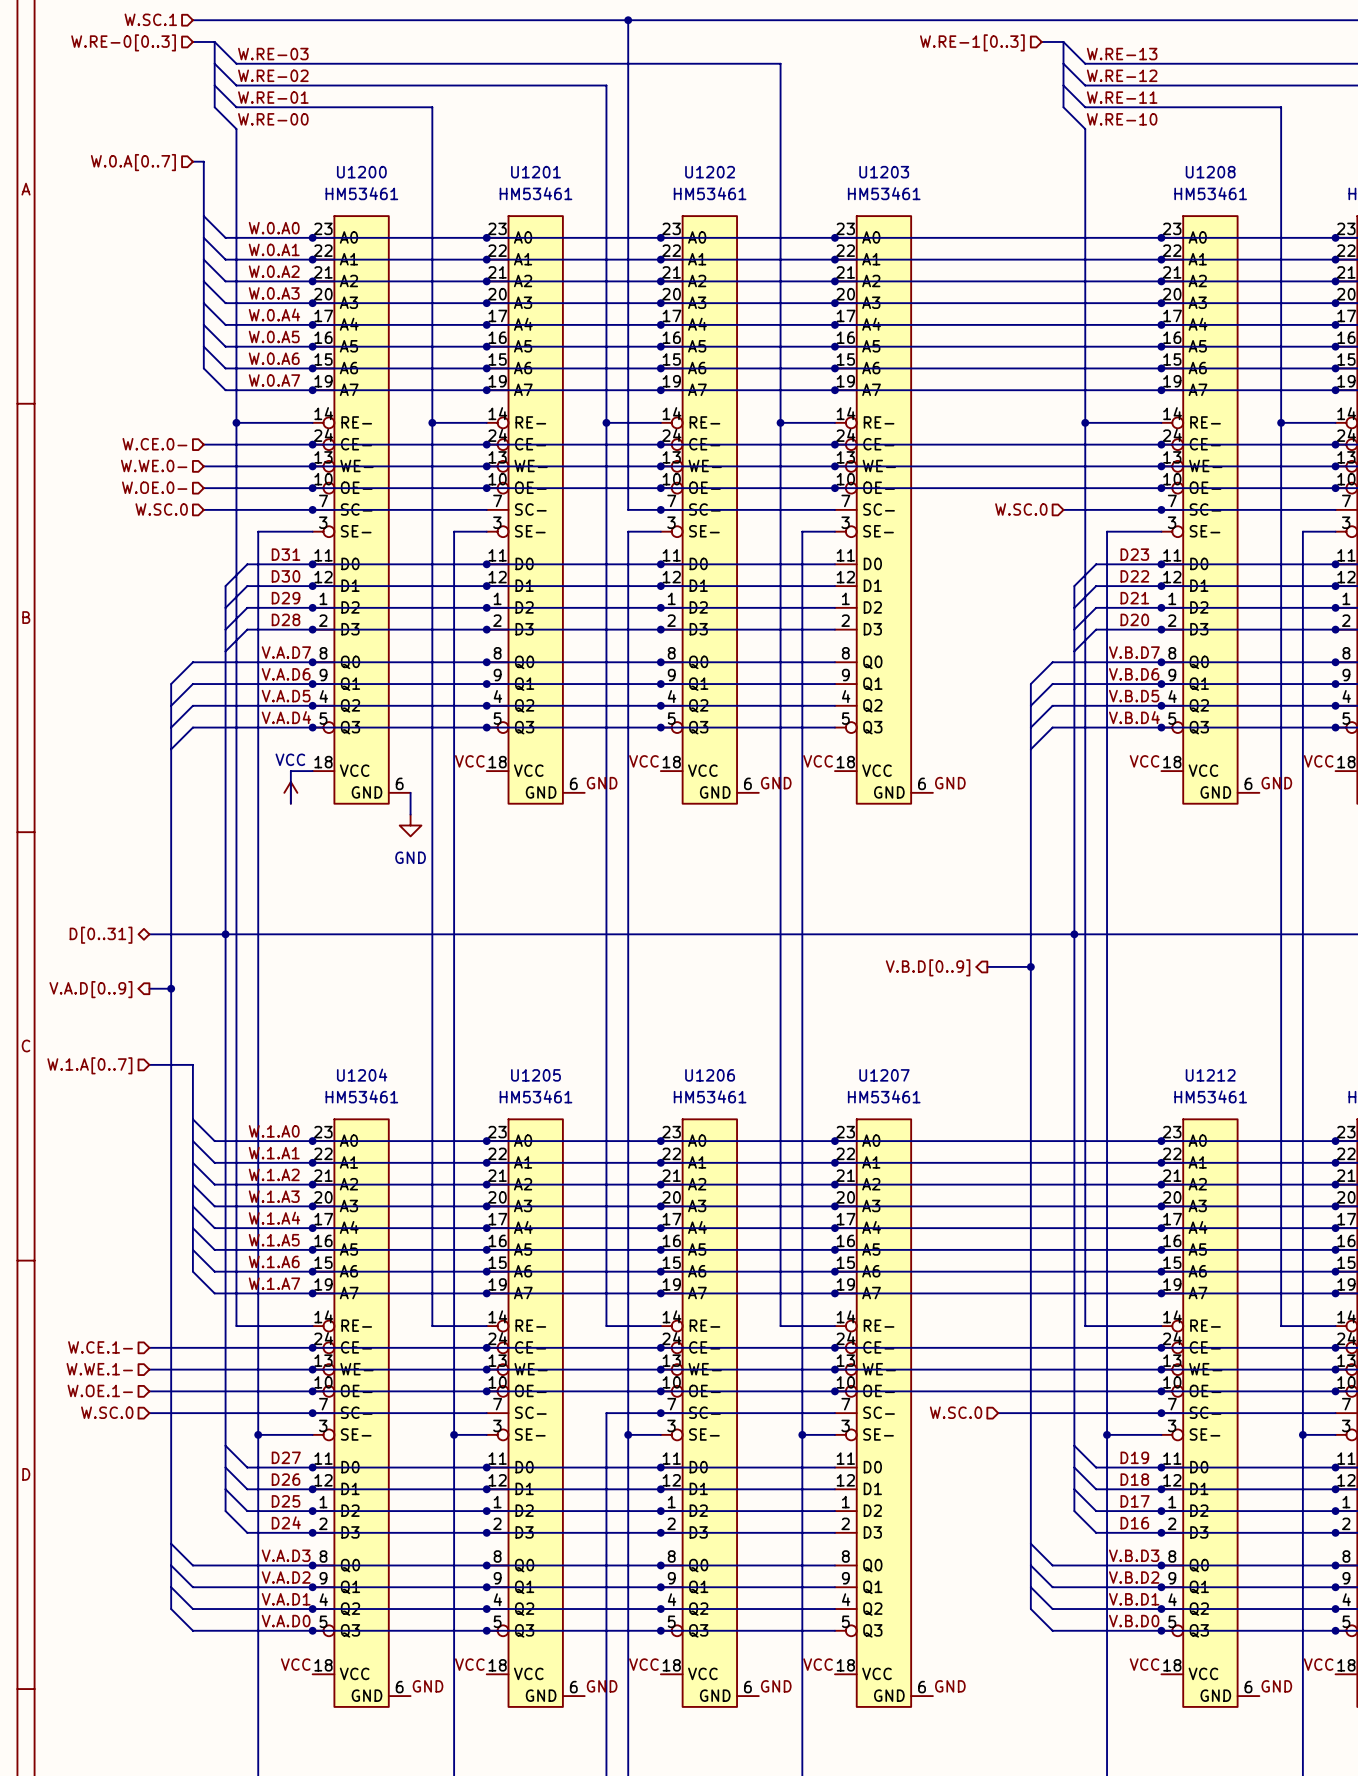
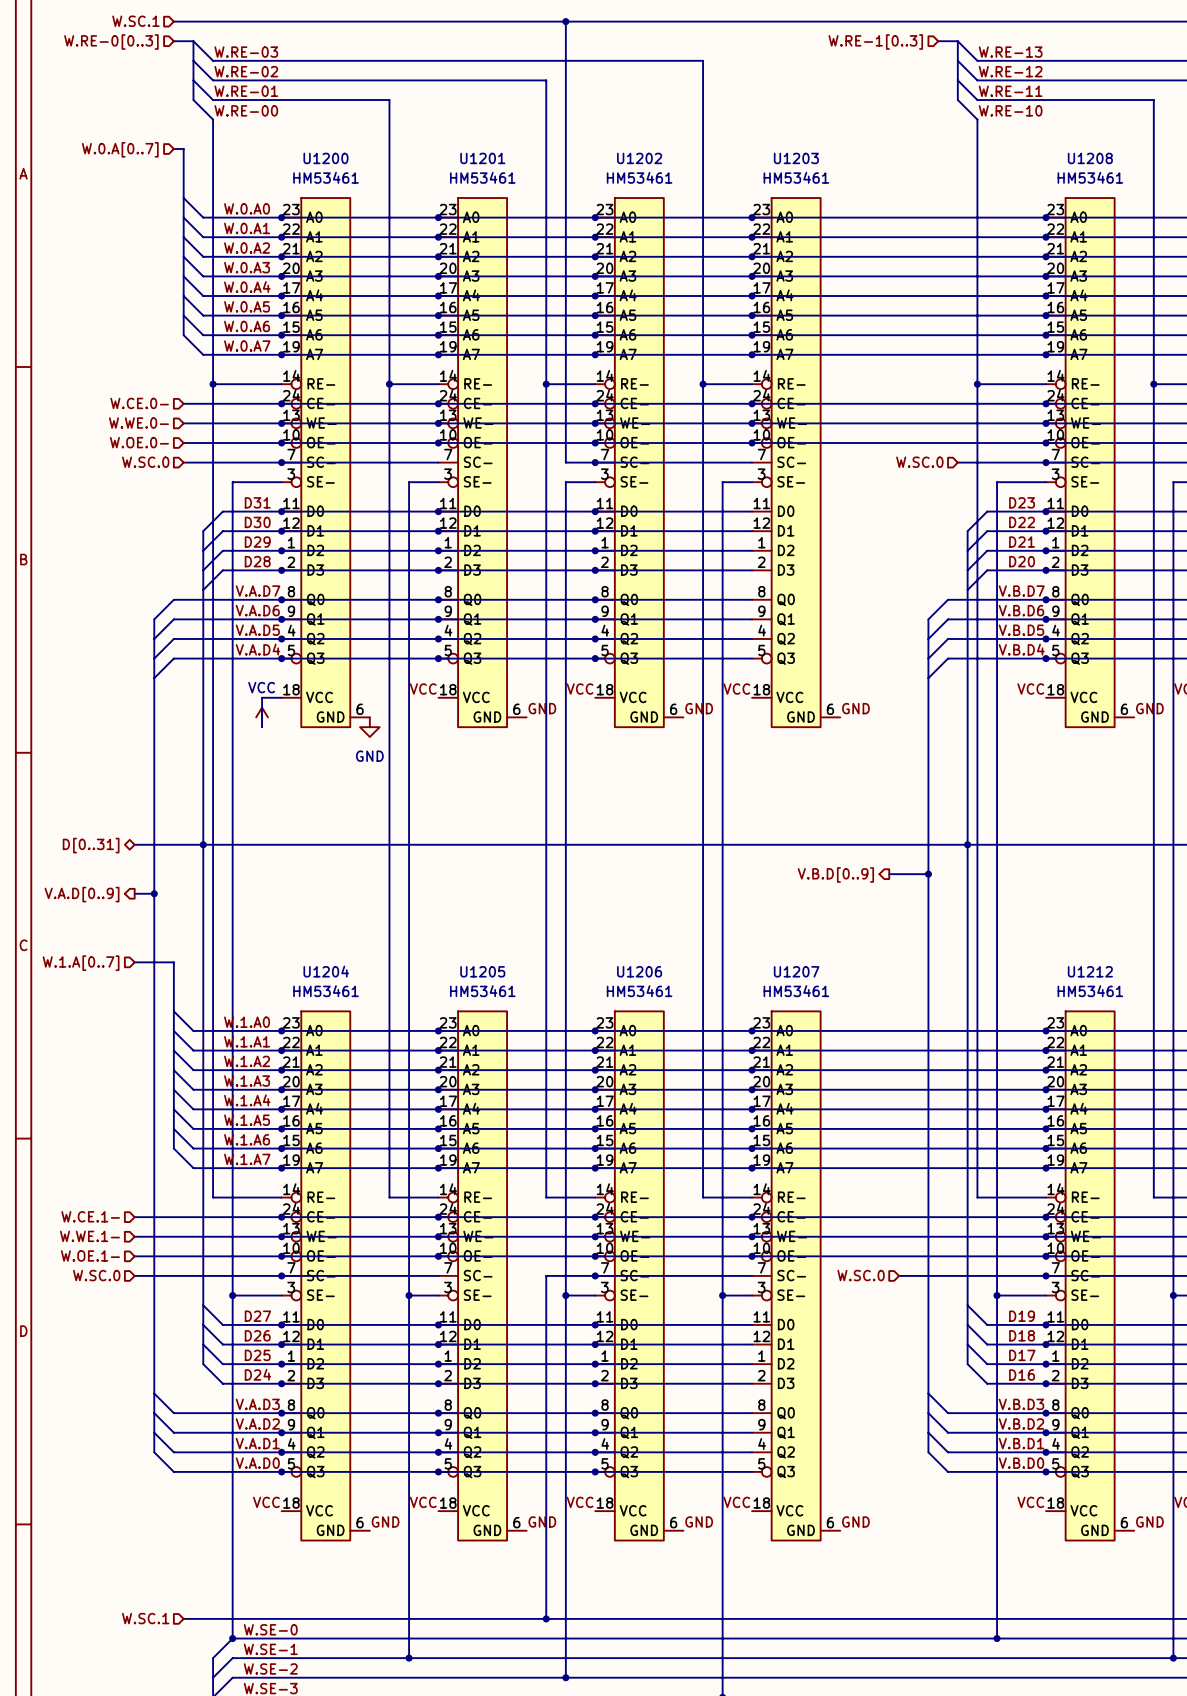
power symbol position: GND (410, 825) -> GND (369, 727)

